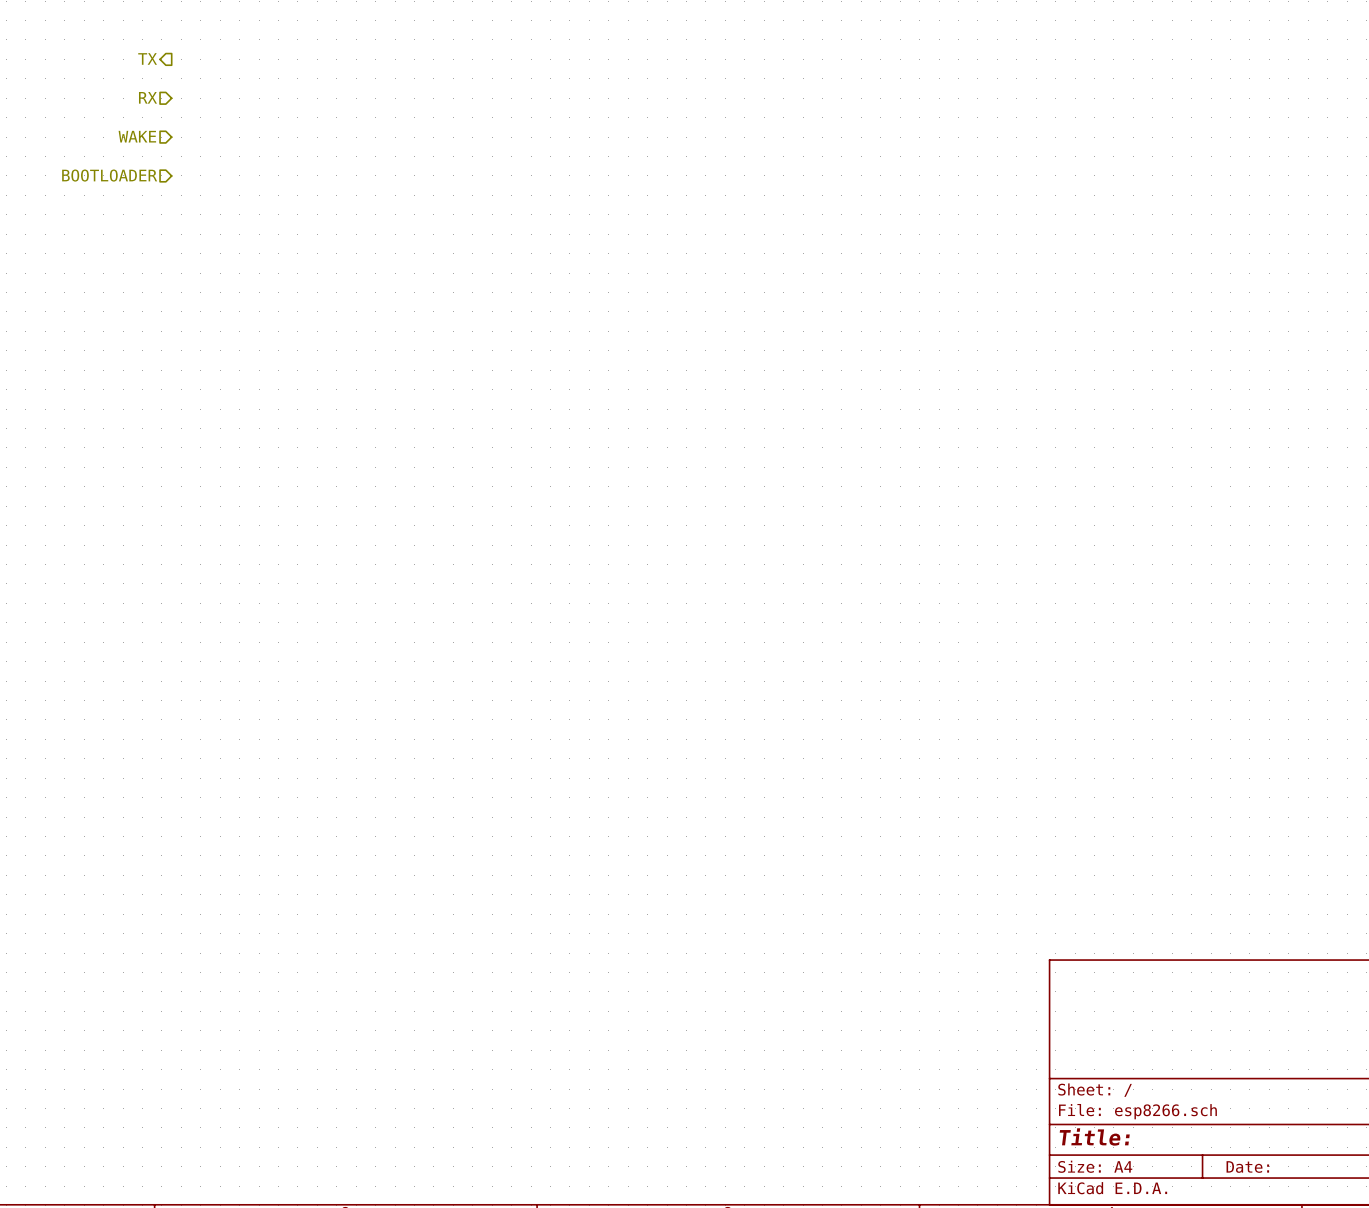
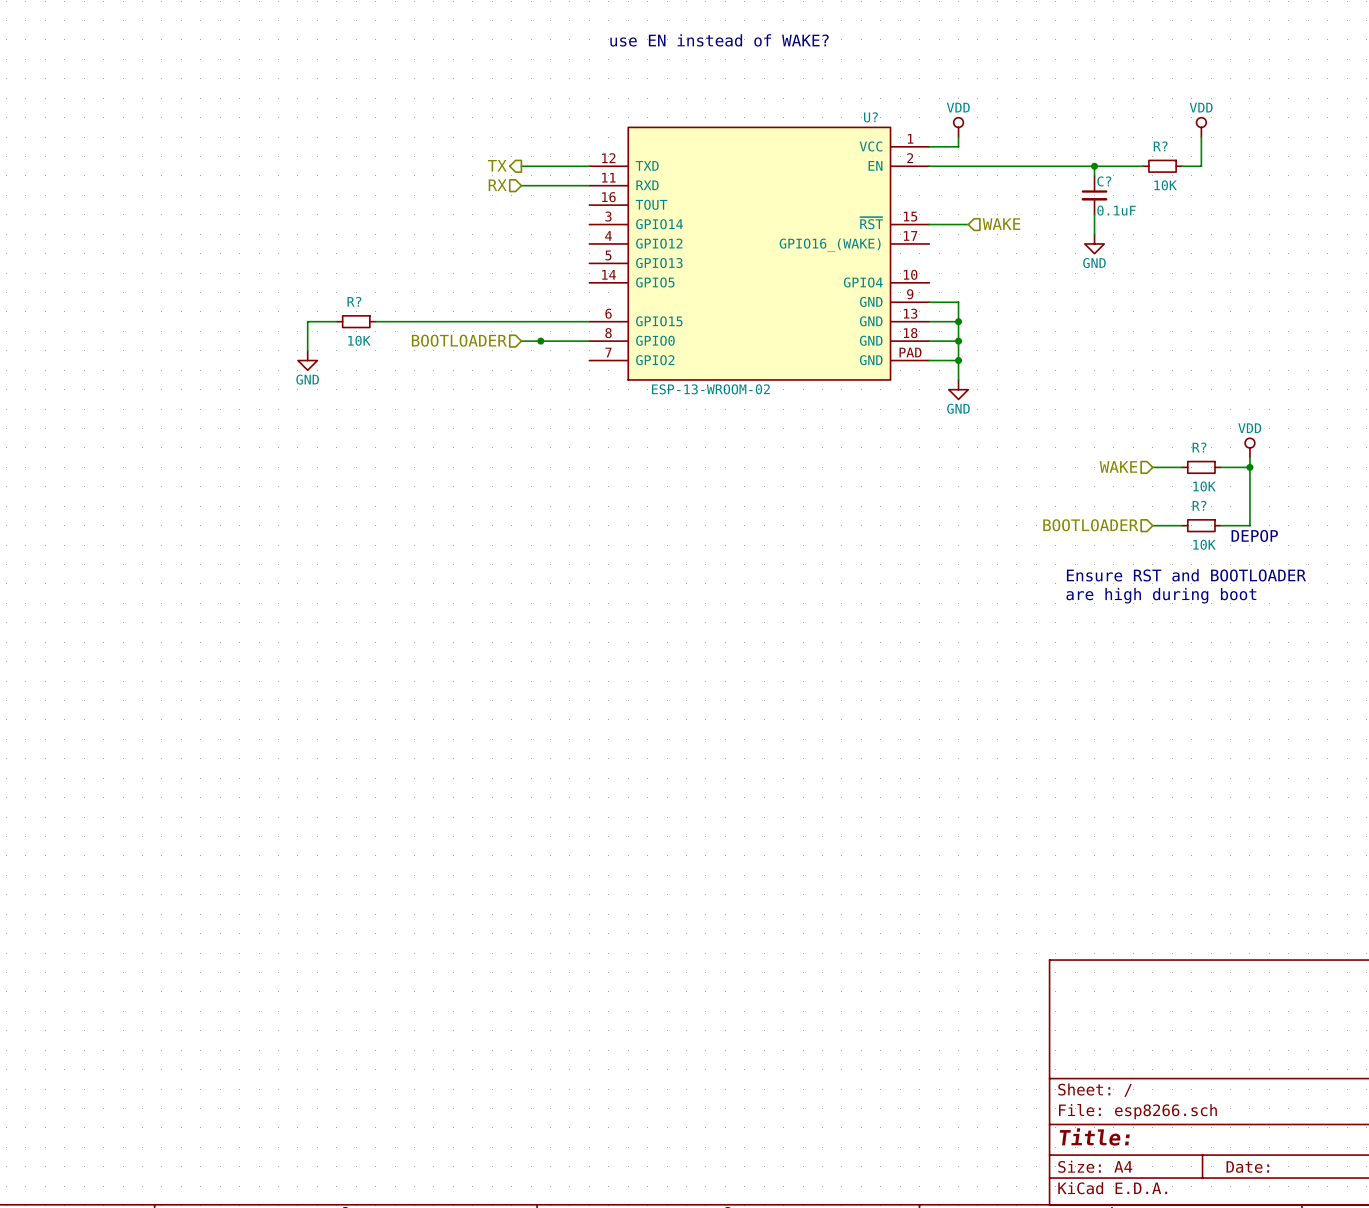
text: none -> use EN instead of WAKE? (719, 40)
hierarchical label: TX (147, 58) -> none
hierarchical label: RX (147, 97) -> none
power symbol: none -> VDD (958, 127)
power symbol: none -> VDD (1201, 127)
hierarchical label: WAKE (137, 136) -> none
wire: none -> (958, 137) (958, 146) (929, 146)
wire: none -> (1201, 137) (1201, 166) (1181, 166)
hierarchical label: none -> TX (497, 165)
wire: none -> (521, 166) (589, 166)
wire: none -> (929, 166) (1143, 166)
wire: none -> (1094, 166) (1094, 175)
junction: none -> (1094, 166)
R?: none -> 10K (1162, 166)
hierarchical label: BOOTLOADER (109, 175) -> none
hierarchical label: none -> RX (497, 185)
wire: none -> (521, 185) (589, 185)
C?: none -> 0.1uF (1094, 195)
wire: none -> (1094, 214) (1094, 234)
wire: none -> (929, 224) (968, 224)
hierarchical label: none -> WAKE (1001, 224)
power symbol: none -> GND (1094, 243)
U?: none -> ESP-13-WROOM-02 (759, 253)
wire: none -> (929, 302) (958, 302) (958, 379)
wire: none -> (336, 321) (307, 321) (307, 350)
R?: none -> 10K (356, 321)
wire: none -> (375, 321) (589, 321)
wire: none -> (929, 321) (958, 321)
junction: none -> (958, 321)
hierarchical label: none -> BOOTLOADER (459, 340)
wire: none -> (521, 341) (589, 341)
junction: none -> (540, 341)
wire: none -> (929, 341) (958, 341)
junction: none -> (958, 341)
power symbol: none -> GND (307, 360)
wire: none -> (929, 360) (958, 360)
junction: none -> (958, 360)
power symbol: none -> GND (958, 389)
power symbol: none -> VDD (1249, 447)
wire: none -> (1249, 457) (1249, 525) (1220, 525)
hierarchical label: none -> WAKE (1118, 466)
wire: none -> (1152, 467) (1181, 467)
R?: none -> 10K (1201, 467)
wire: none -> (1220, 467) (1249, 467)
junction: none -> (1249, 467)
hierarchical label: none -> BOOTLOADER (1090, 525)
wire: none -> (1152, 525) (1181, 525)
R?: none -> 10K (1201, 525)
text: none -> DEPOP (1254, 535)
text: none -> Ensure RST and BOOTLOADER (1186, 575)
text: none -> are high during boot (1161, 595)

